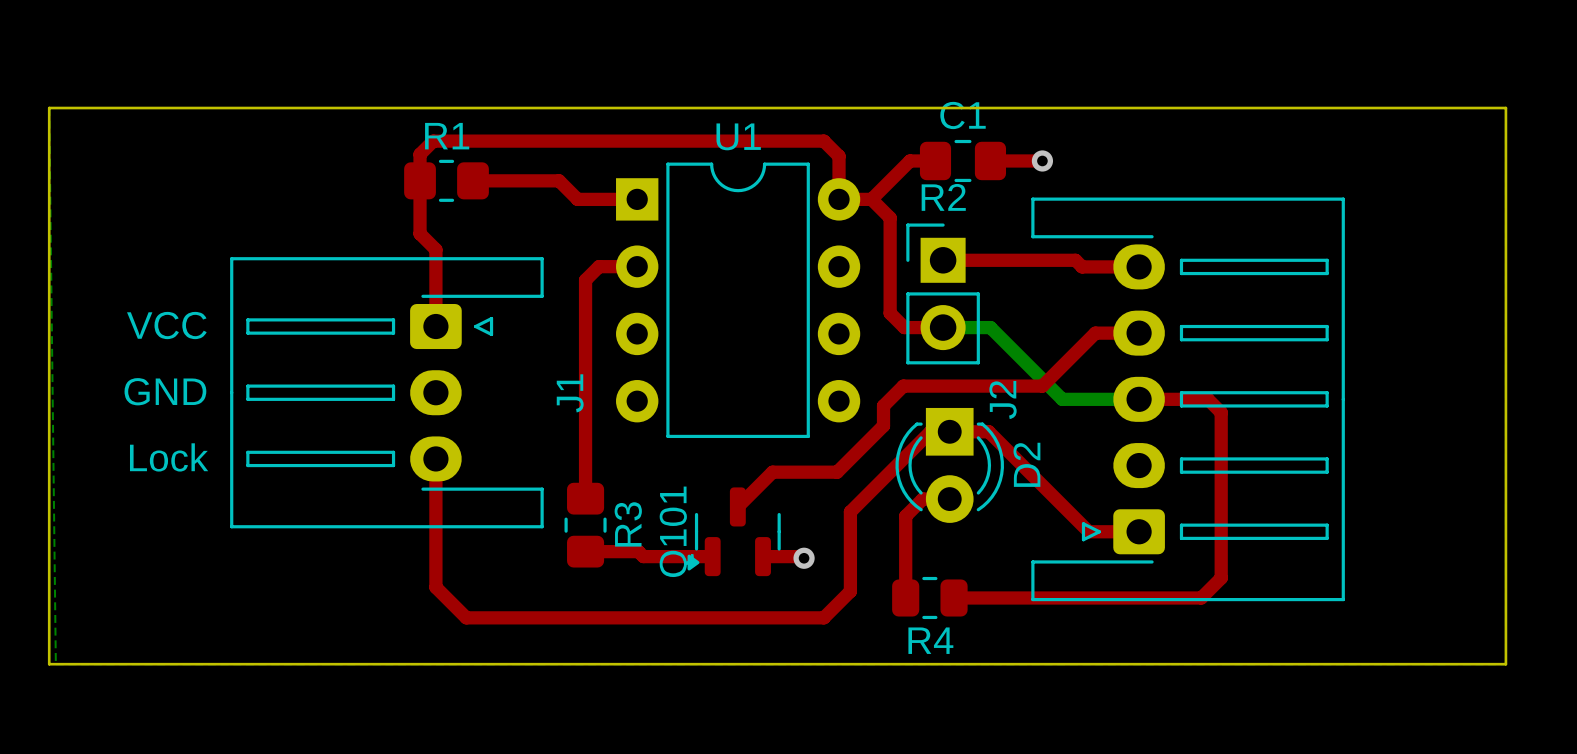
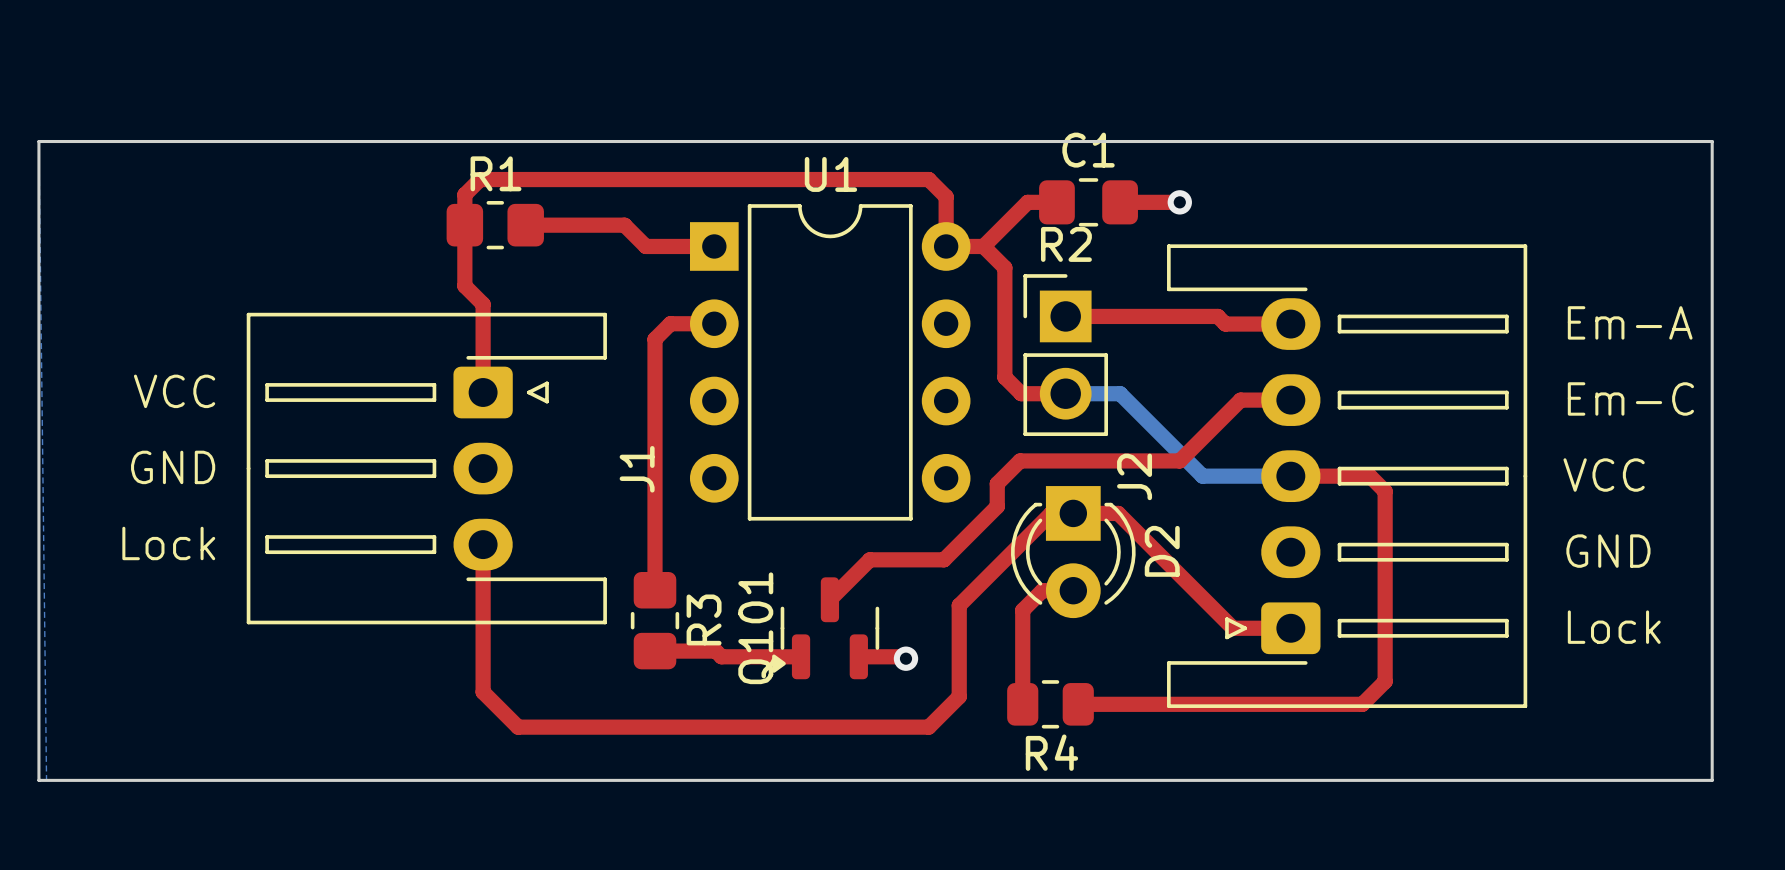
text: none -> Em-A (1630, 322)
text: none -> Em-C (1630, 398)
text: none -> VCC (1604, 475)
text: none -> GND (1608, 551)
text: none -> Lock (1614, 627)

